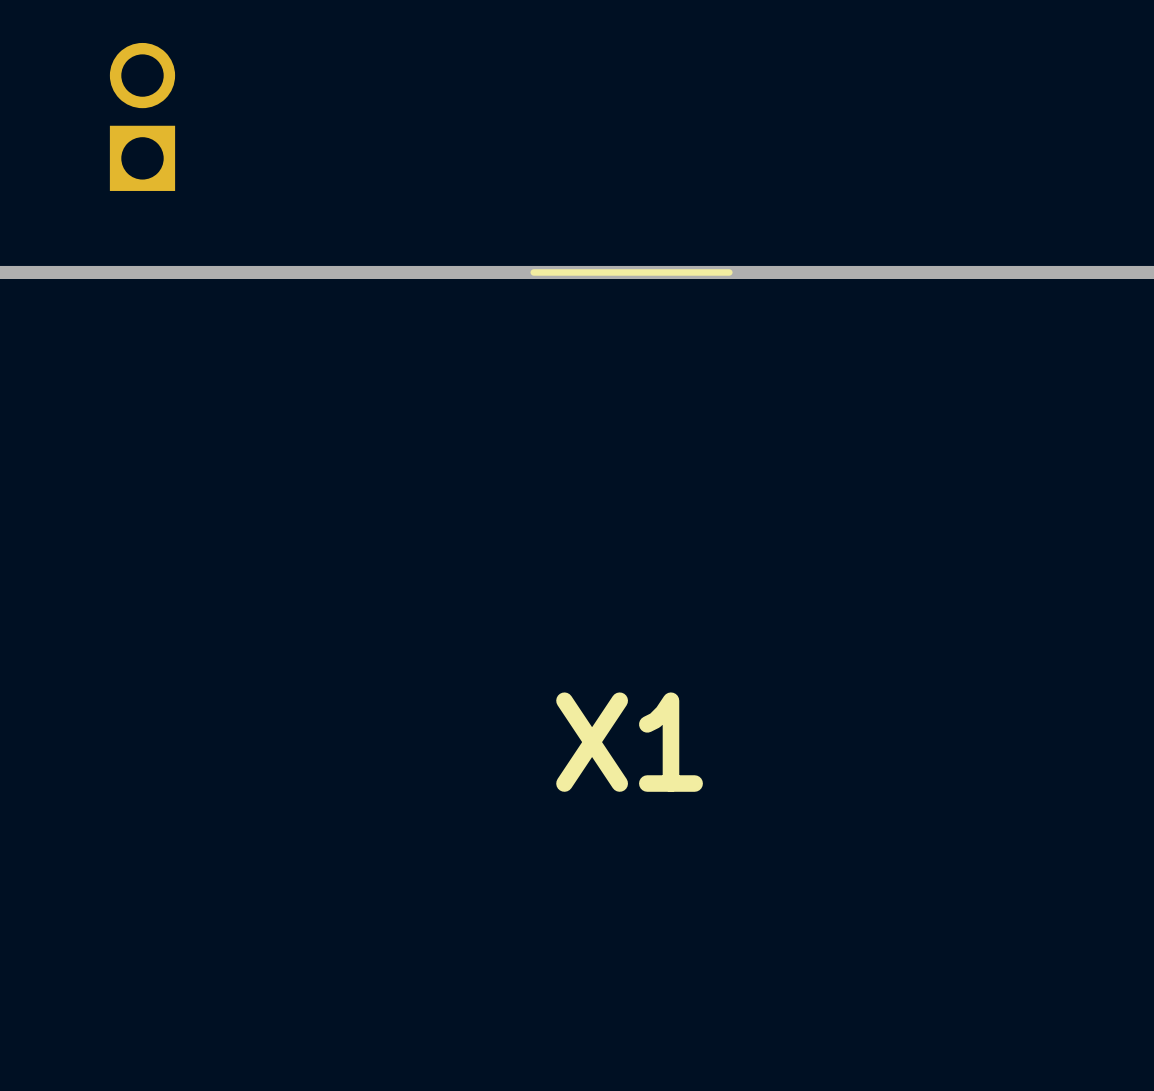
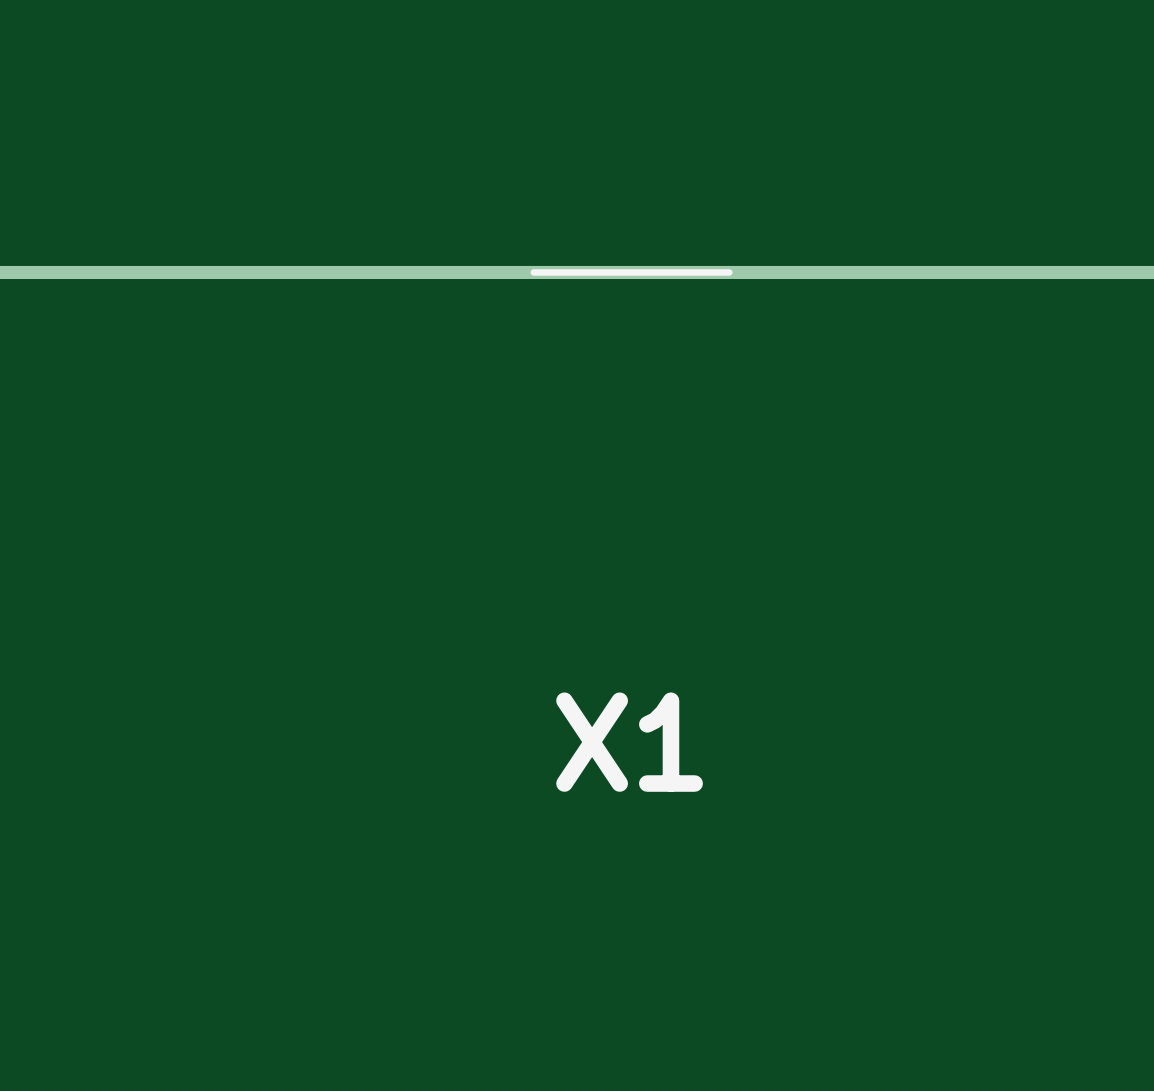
part: (142, 116) -> none

